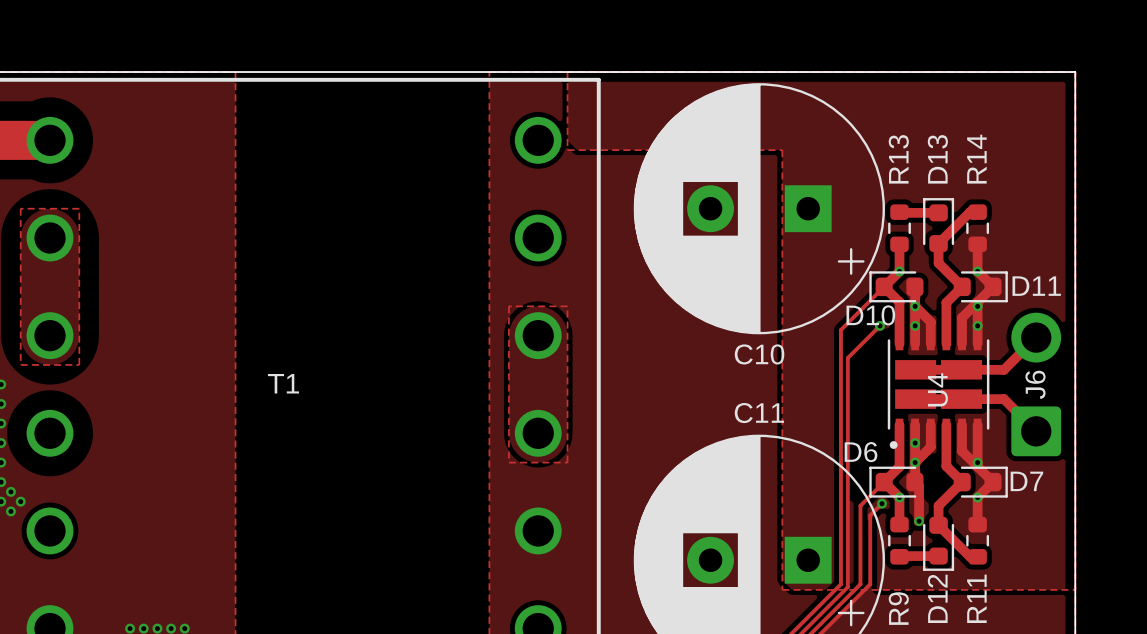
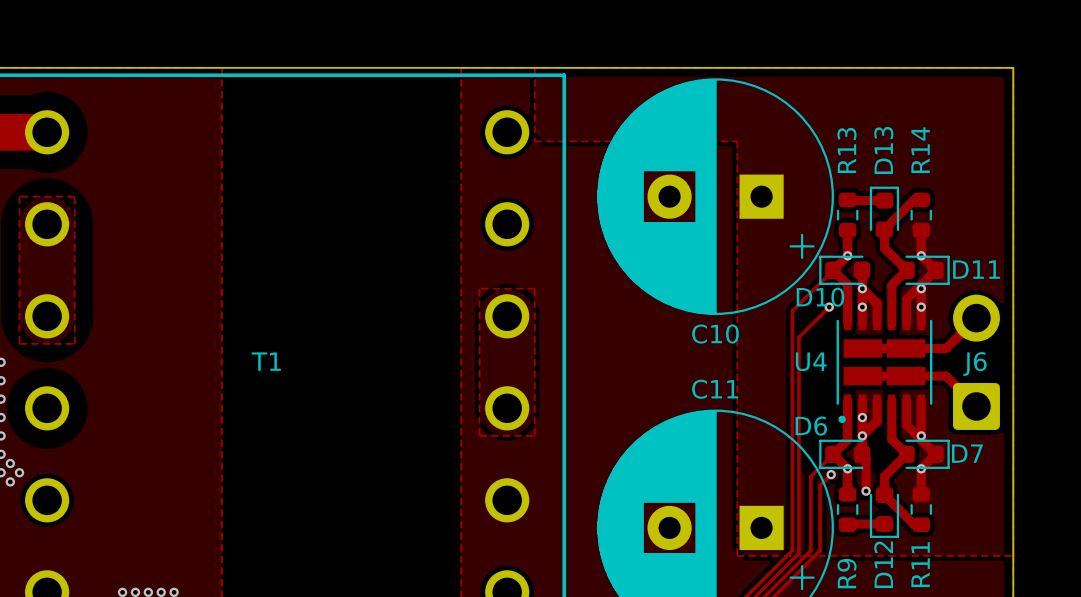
J6 name rotation: 0° (1035, 384) -> 90° clockwise (975, 363)
U4 name rotation: 0° (937, 389) -> 90° clockwise (811, 361)
U4 name position: U4 (937, 389) -> U4 (811, 361)

